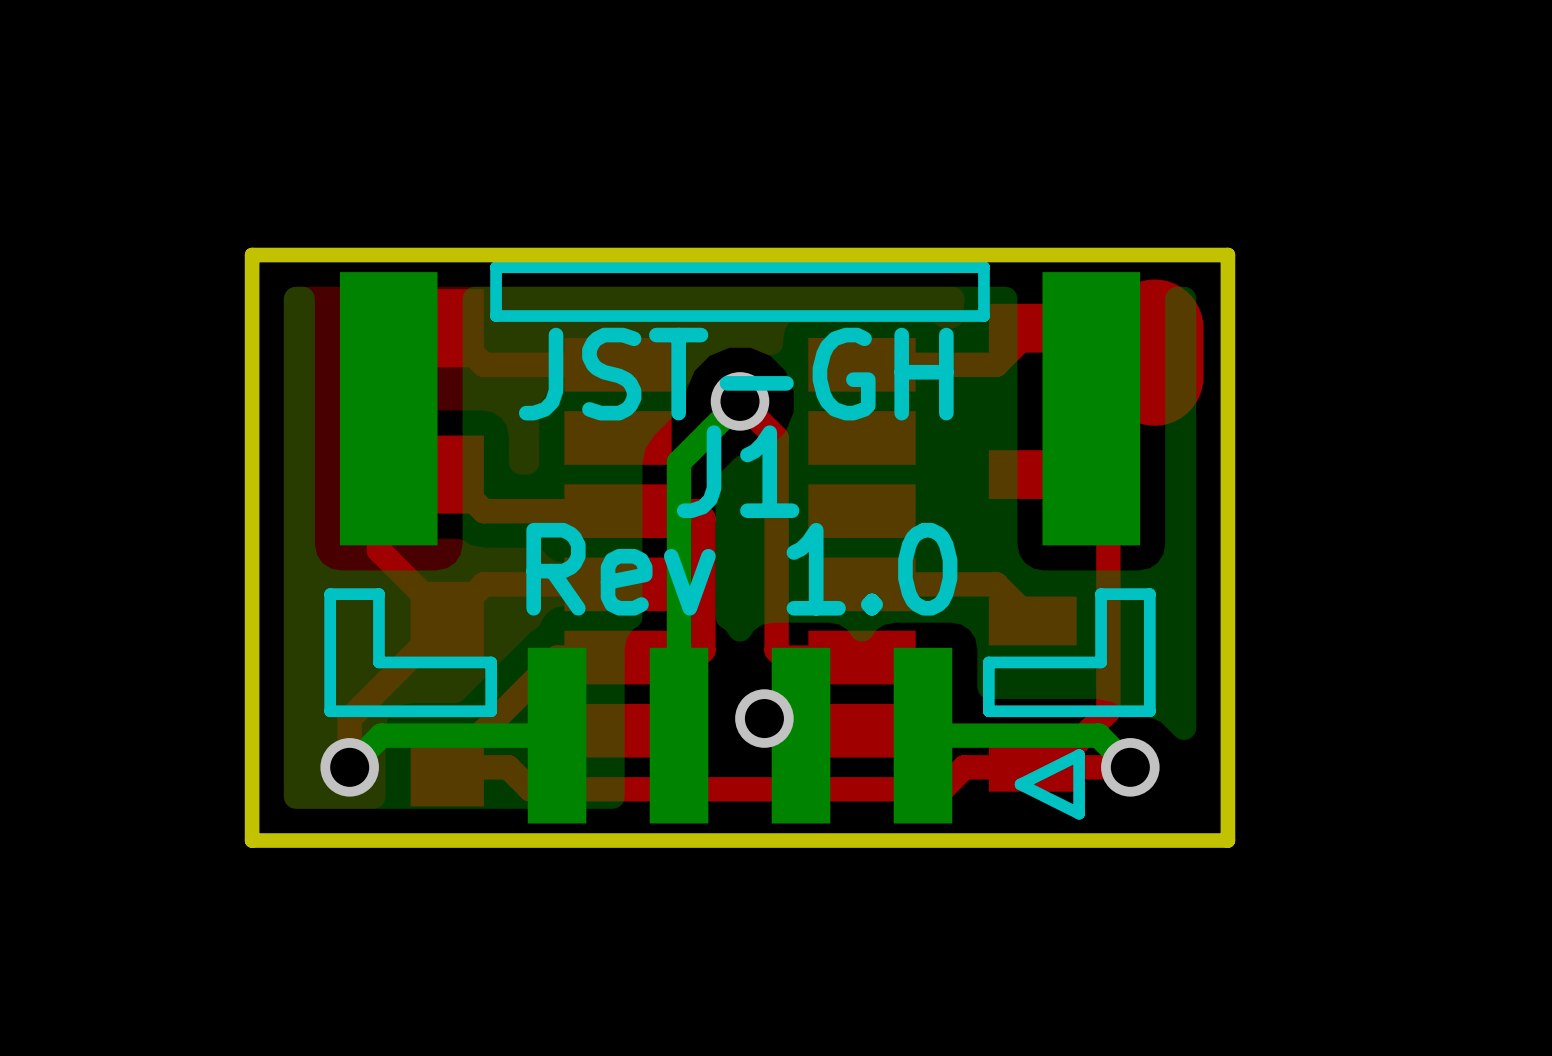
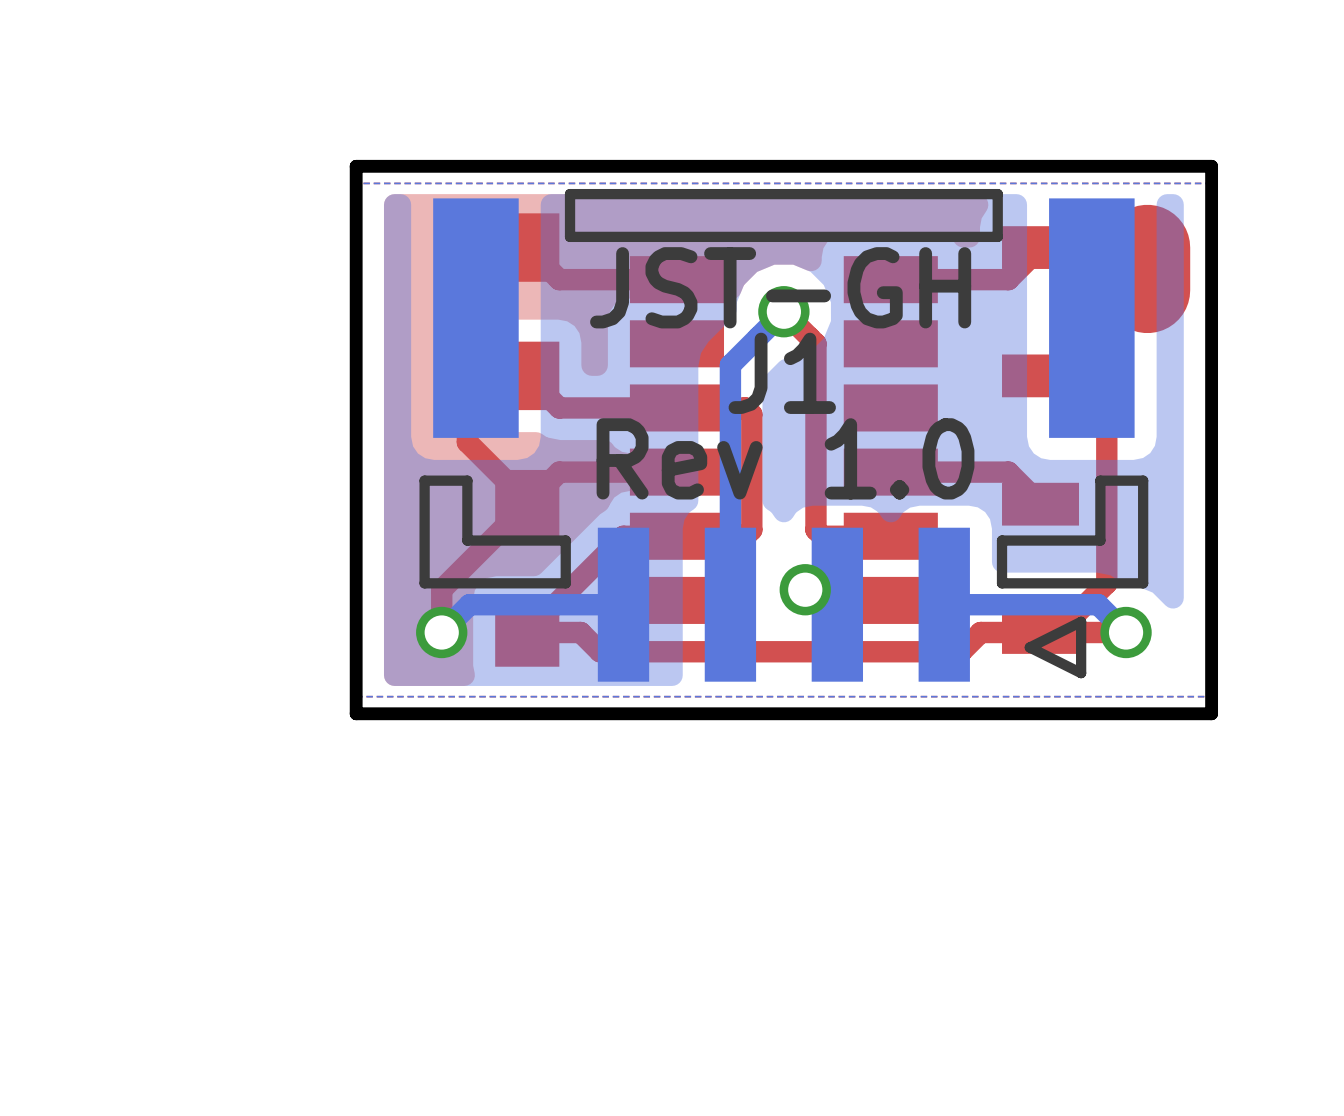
board edge: (1227, 255) (252, 255) -> (1211, 183) (1211, 166) (356, 166) (356, 183)
board edge: (1227, 840) (252, 840) -> (1211, 696) (1211, 713) (356, 713) (356, 696)

